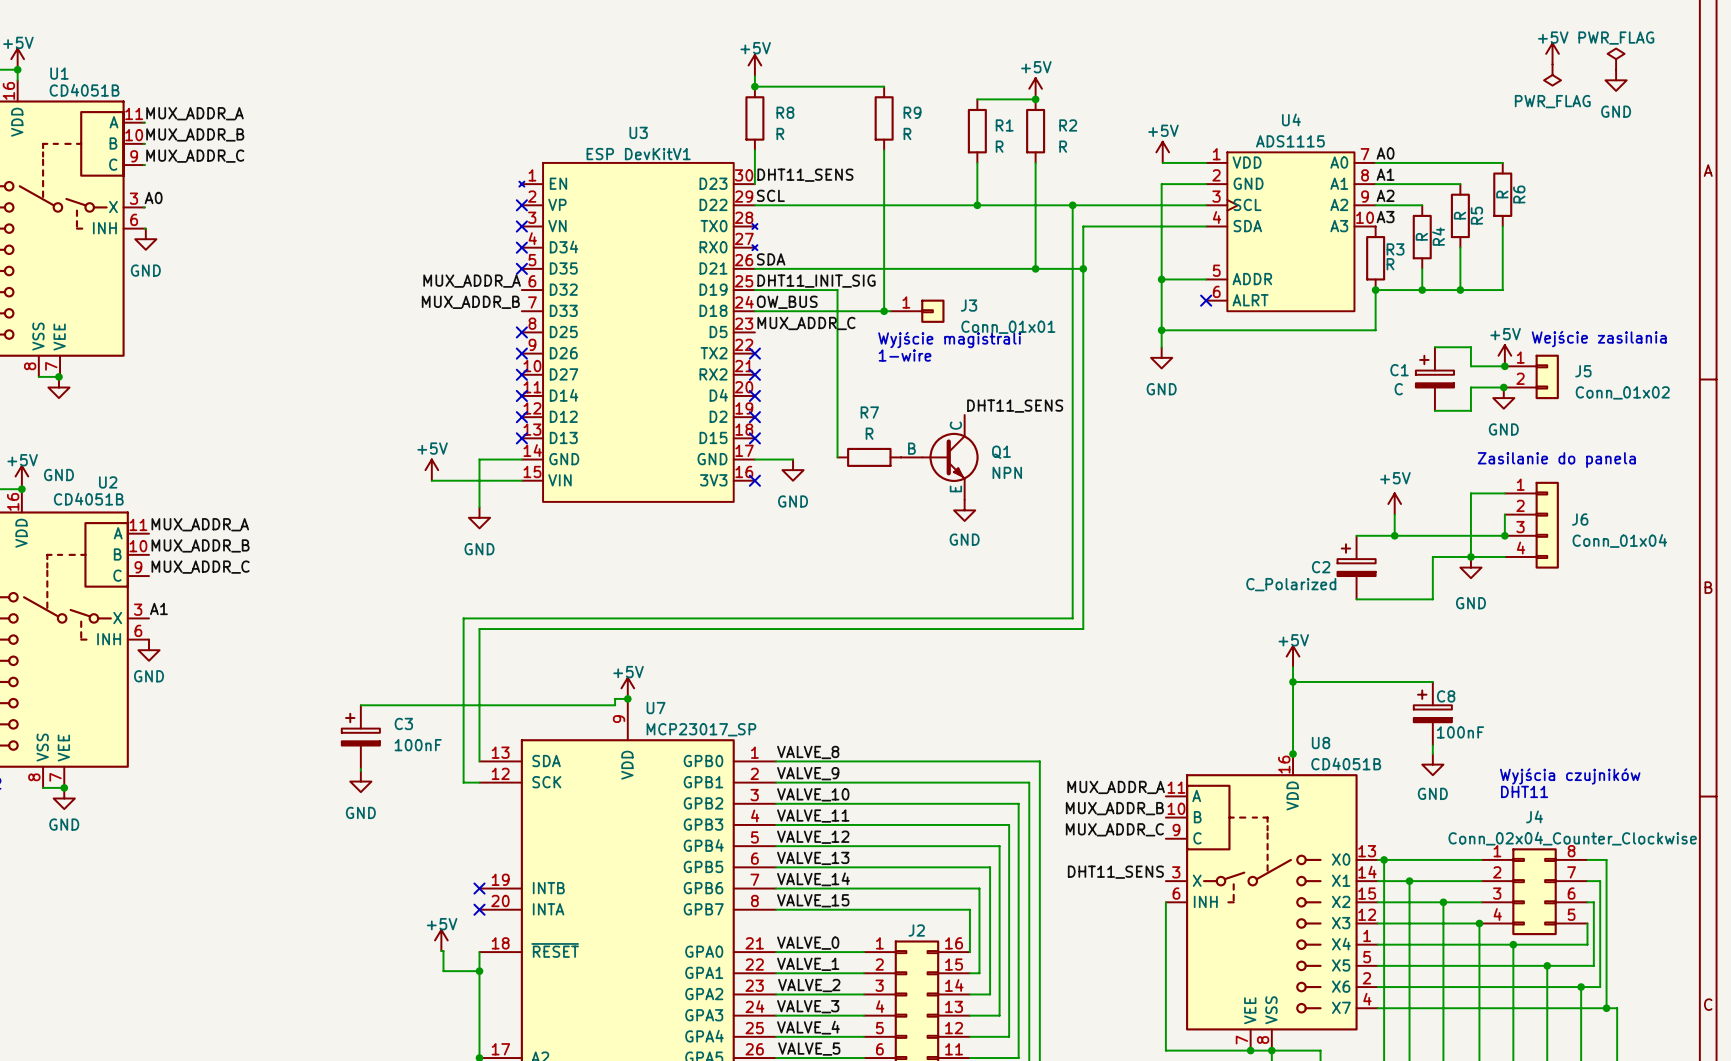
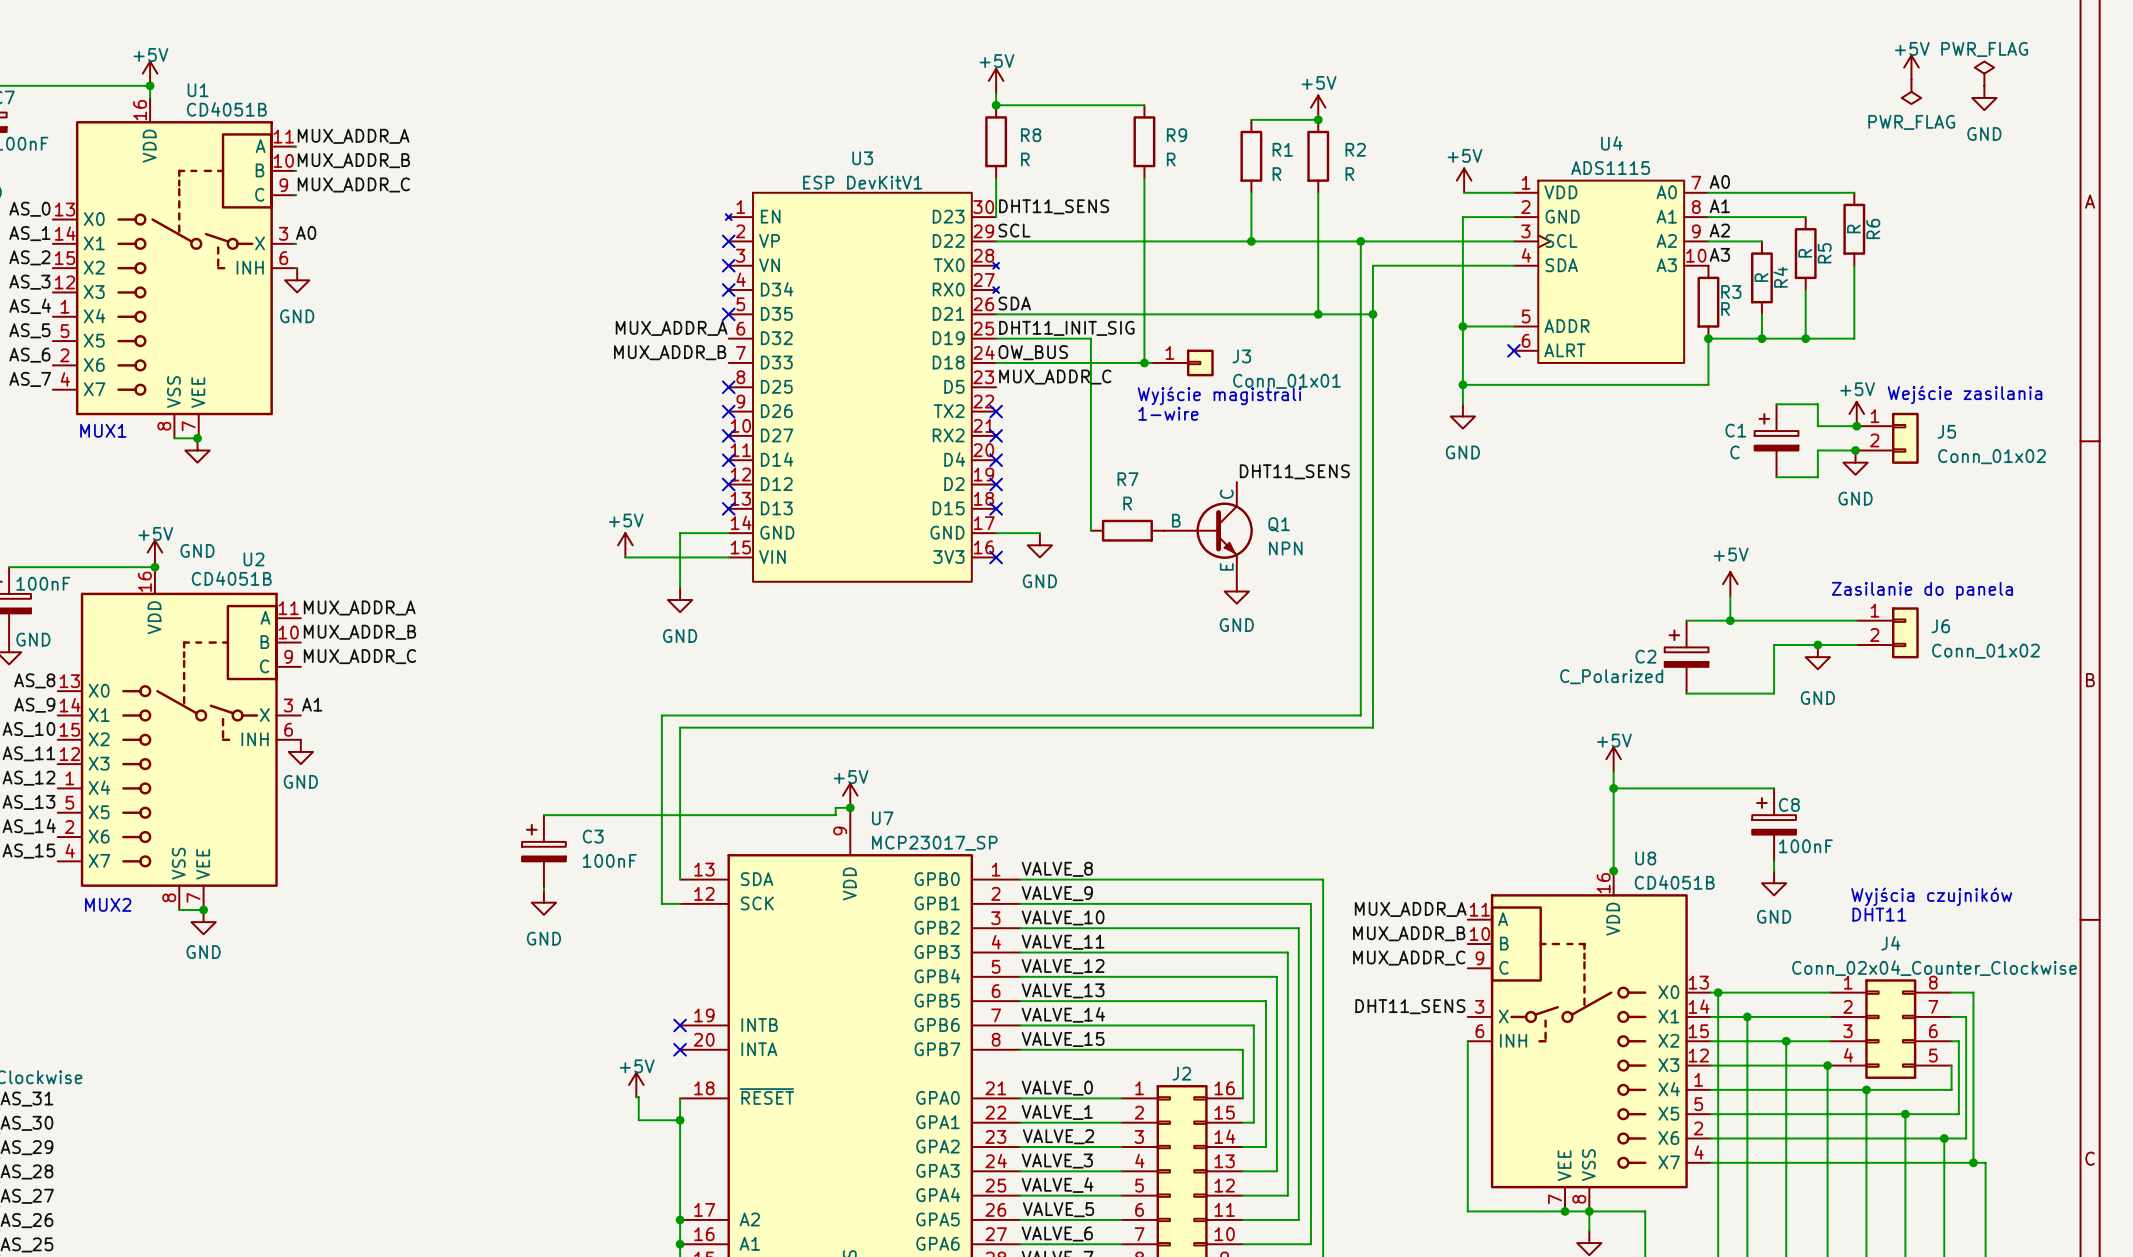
text position: Zasilanie do panela (1556, 460) -> Zasilanie do panela (1922, 590)
J6 symbol: [1504, 481, 1559, 569] -> [1856, 607, 1919, 659]
wire: (1504, 493) (1470, 493) (1470, 556) -> none
wire: (1504, 514) (1504, 535) -> none
junction: (1504, 535) -> none
J6 value: Conn_01x04 (1619, 540) -> Conn_01x02 (1985, 651)

